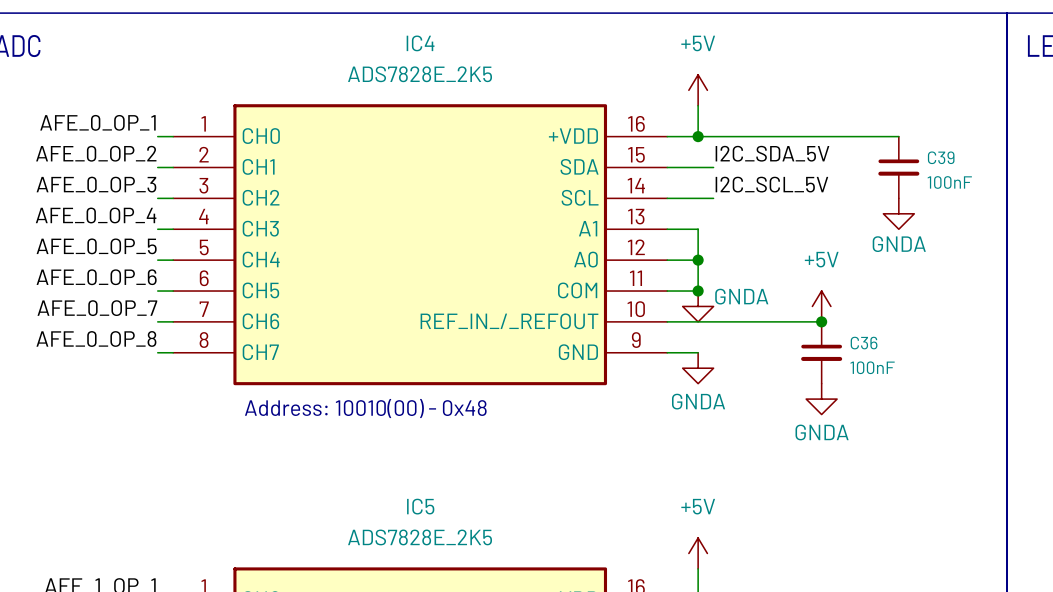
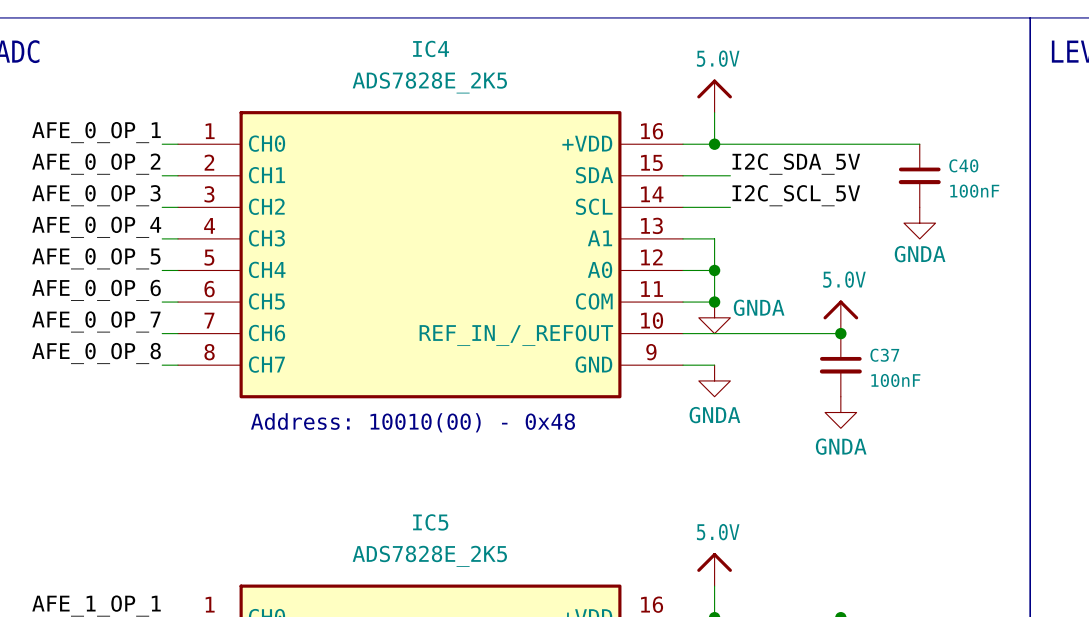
power symbol: +5V (698, 90) -> 5.0V (714, 96)
C39 name: C39 (941, 157) -> C40 (963, 165)
power symbol: +5V (821, 306) -> 5.0V (840, 317)
C36 name: C36 (864, 343) -> C37 (884, 355)
power symbol: +5V (698, 553) -> 5.0V (714, 569)

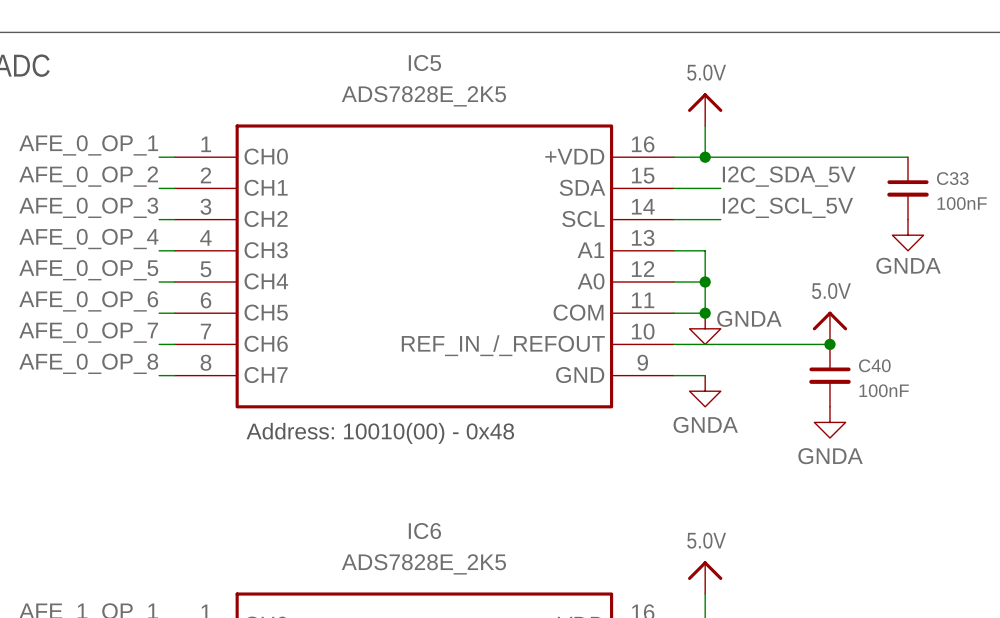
IC4 name: IC4 (431, 48) -> IC5 (424, 63)
C40 name: C40 (963, 165) -> C33 (952, 178)
C37 name: C37 (884, 355) -> C40 (874, 365)
IC5 name: IC5 (430, 522) -> IC6 (424, 531)

